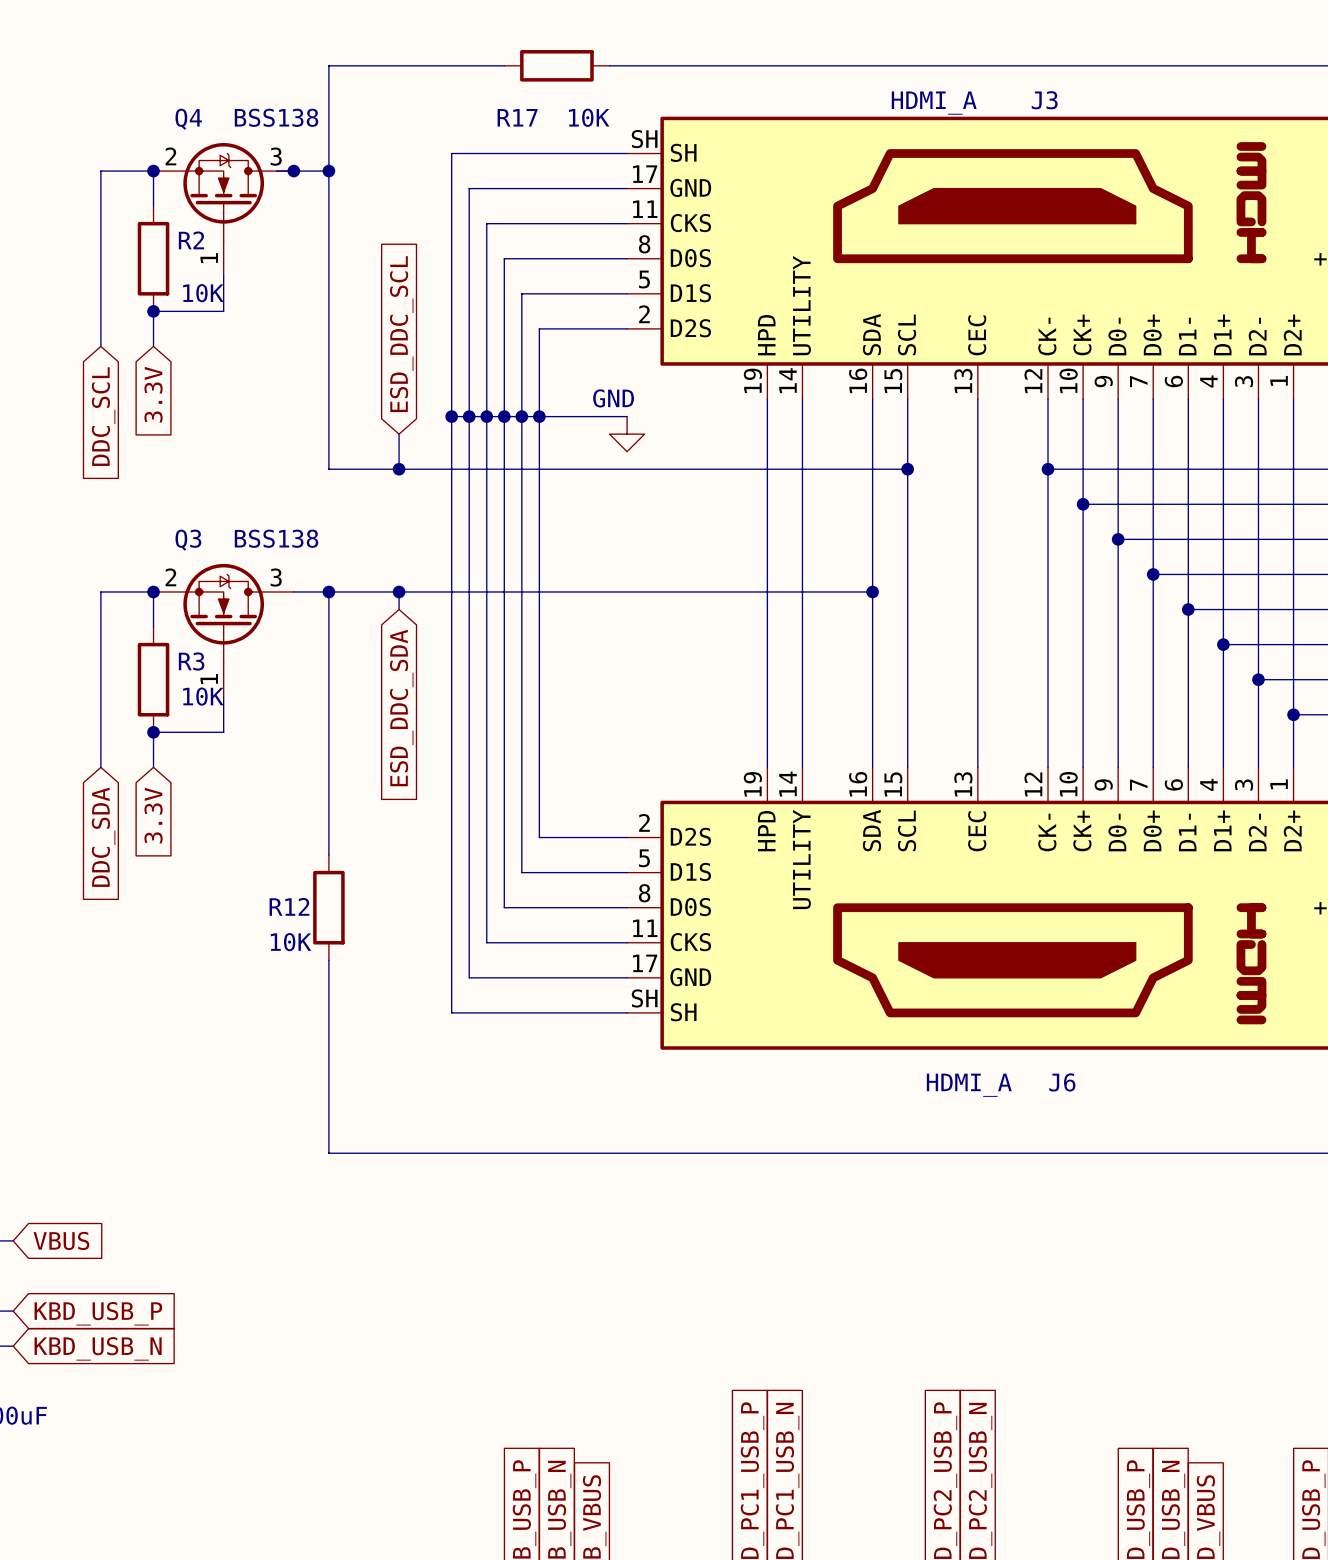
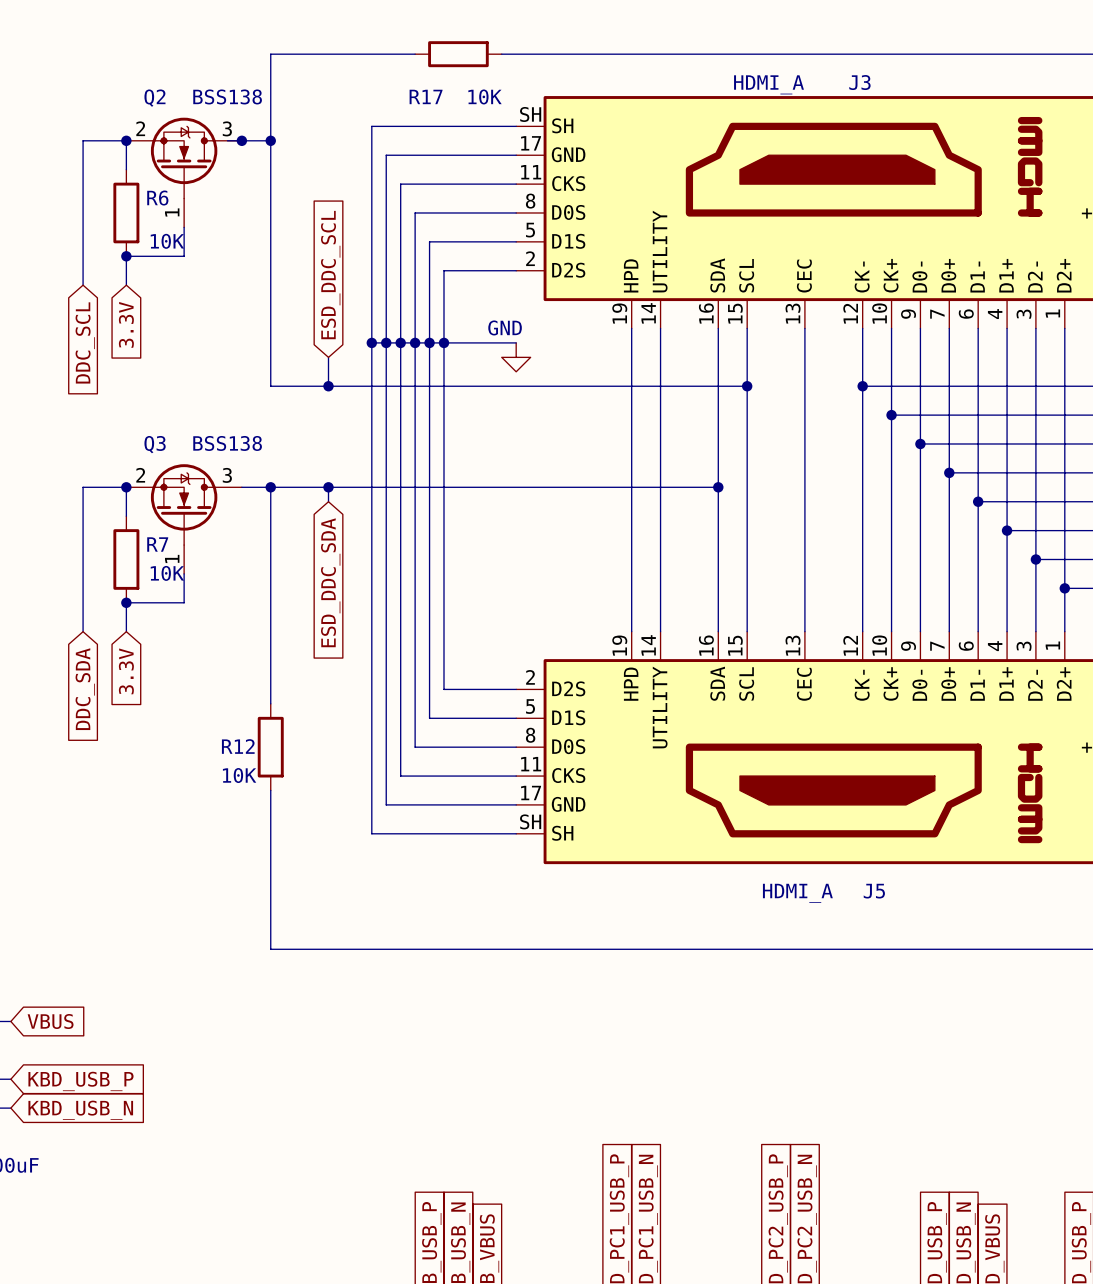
Q4 name: Q4 (188, 119) -> Q2 (154, 98)
R2 name: R2 (191, 240) -> R6 (157, 198)
R3 name: R3 (191, 661) -> R7 (157, 544)
J6 name: J6 (1062, 1082) -> J5 (874, 891)

